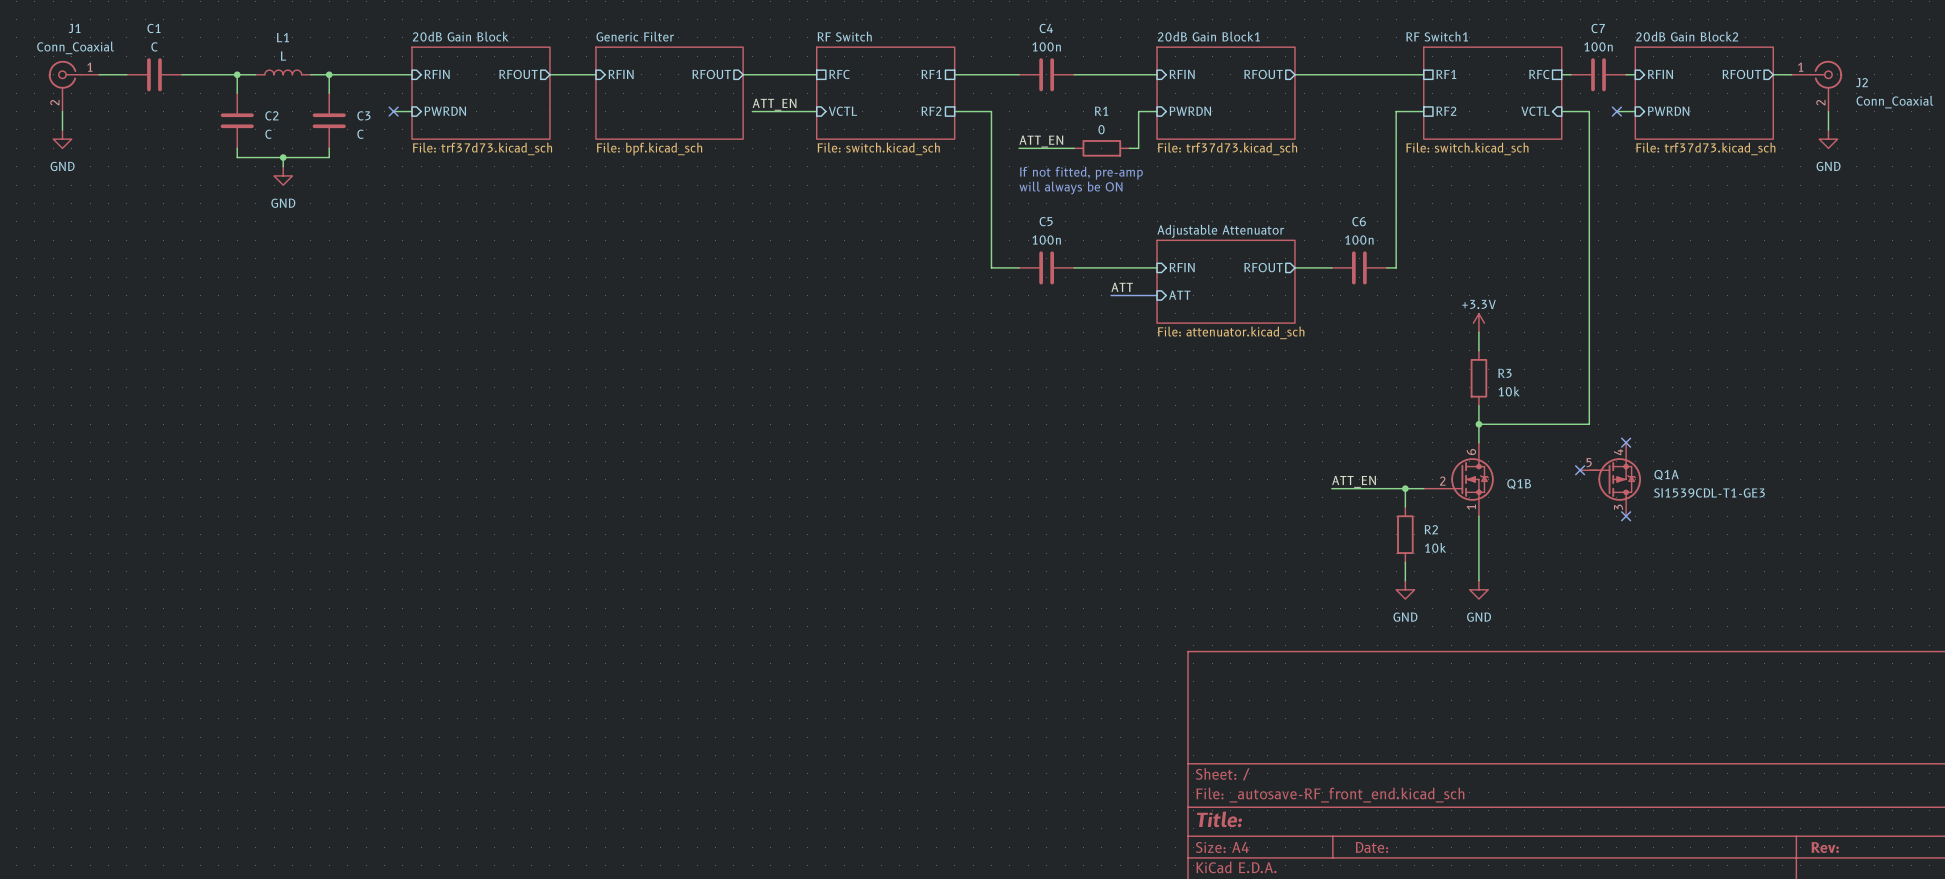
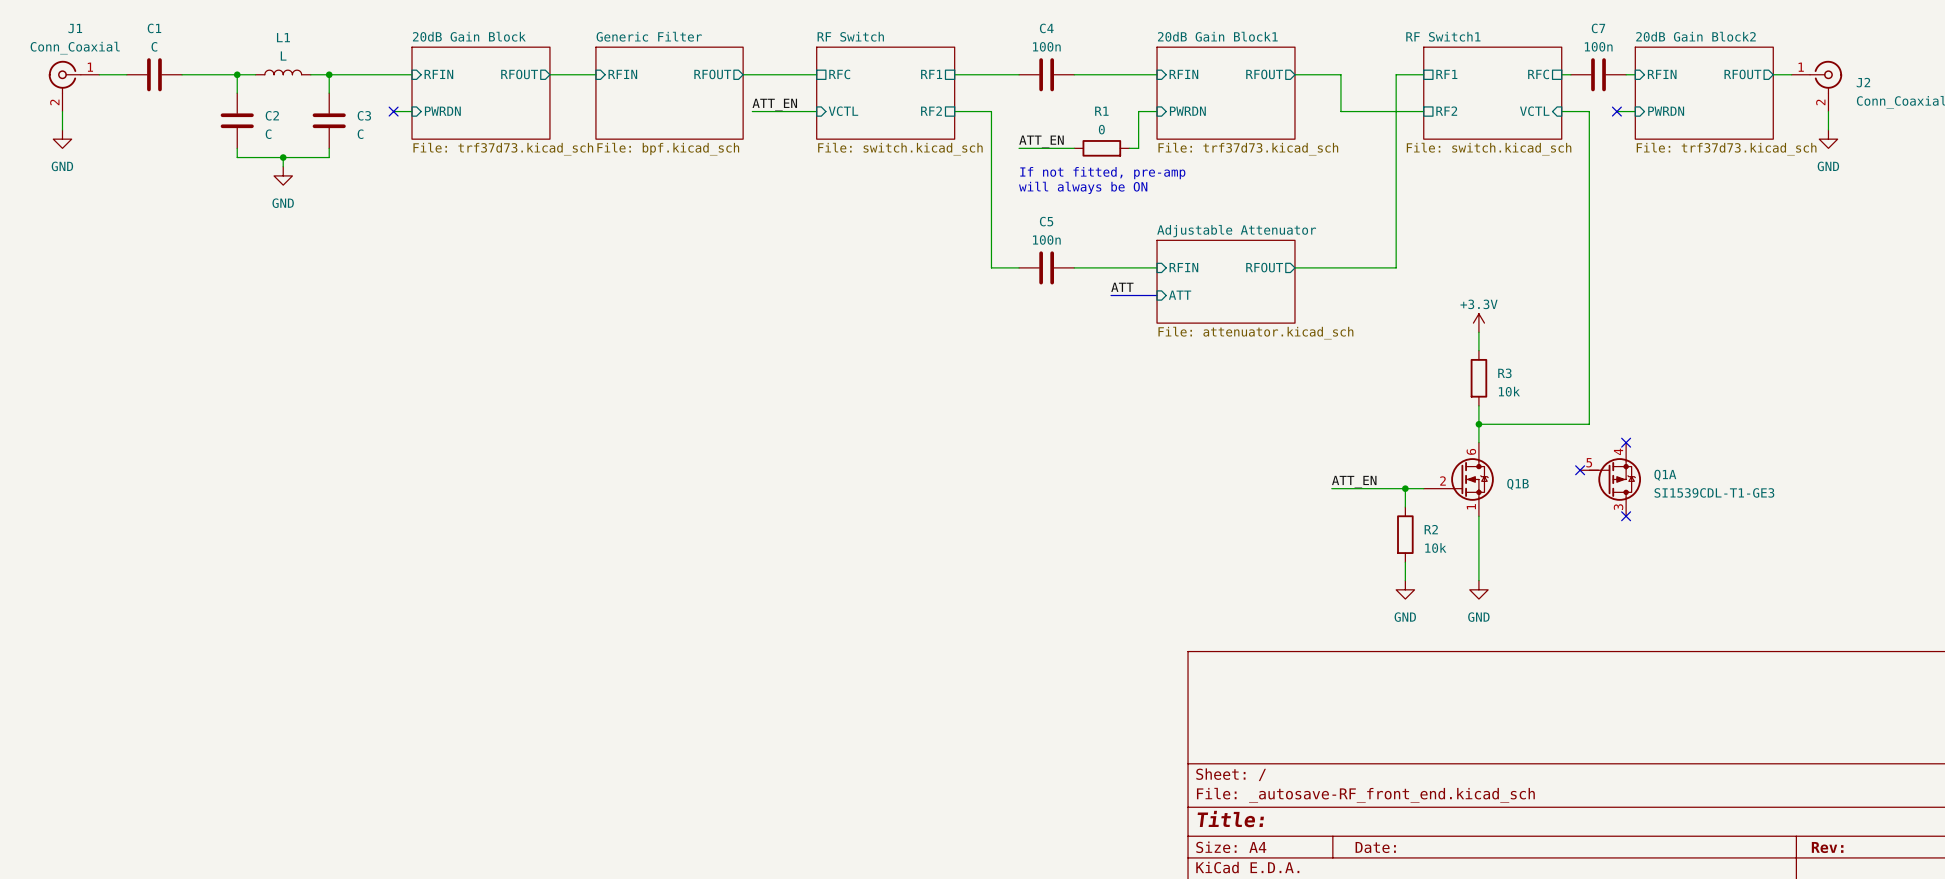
wire: (1340, 74) (1396, 74) -> (1340, 74) (1340, 111) (1396, 111) (1396, 74)
C6: 100n (1359, 267) -> none

